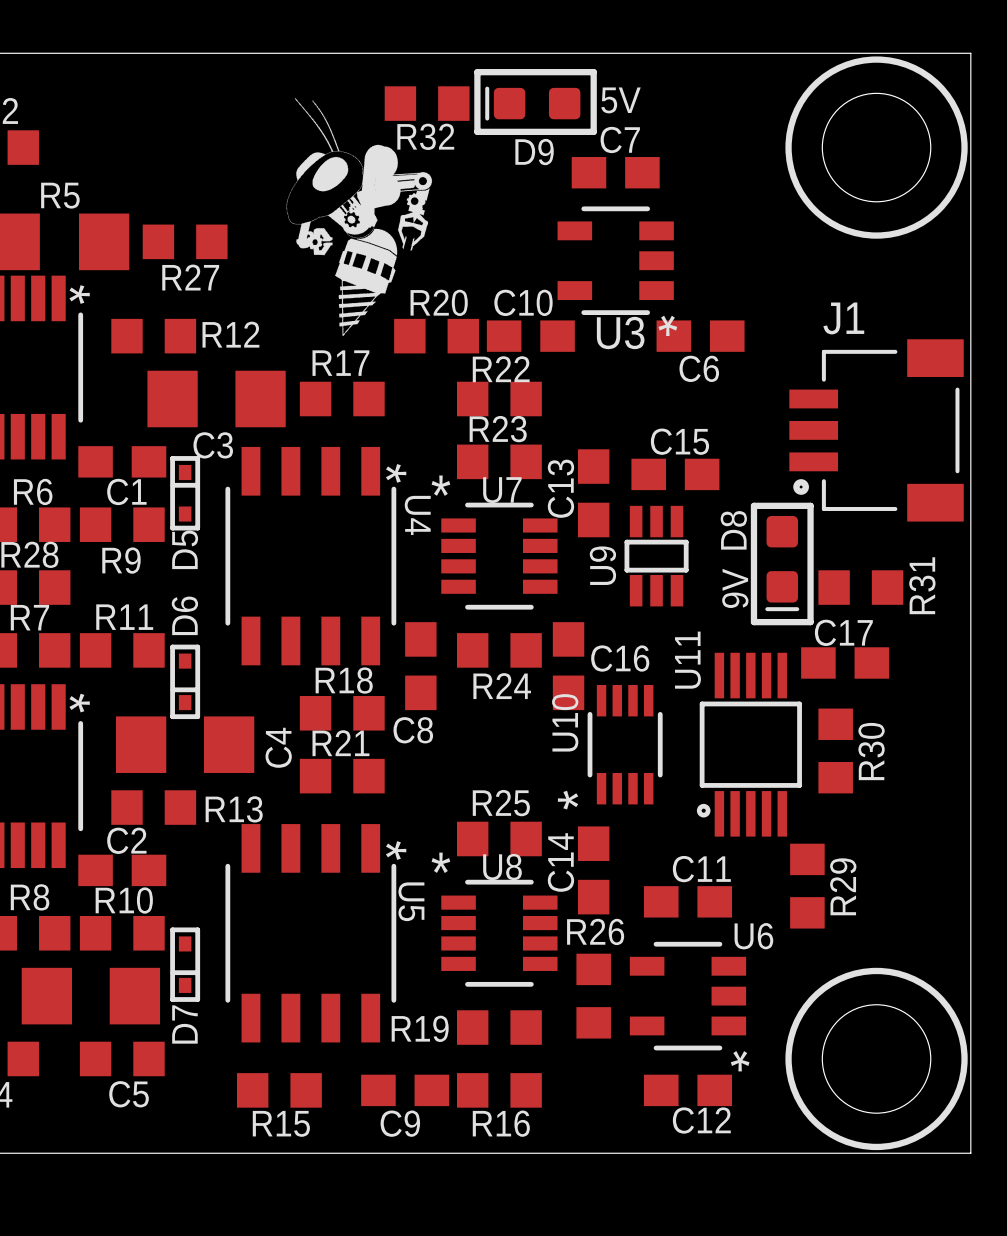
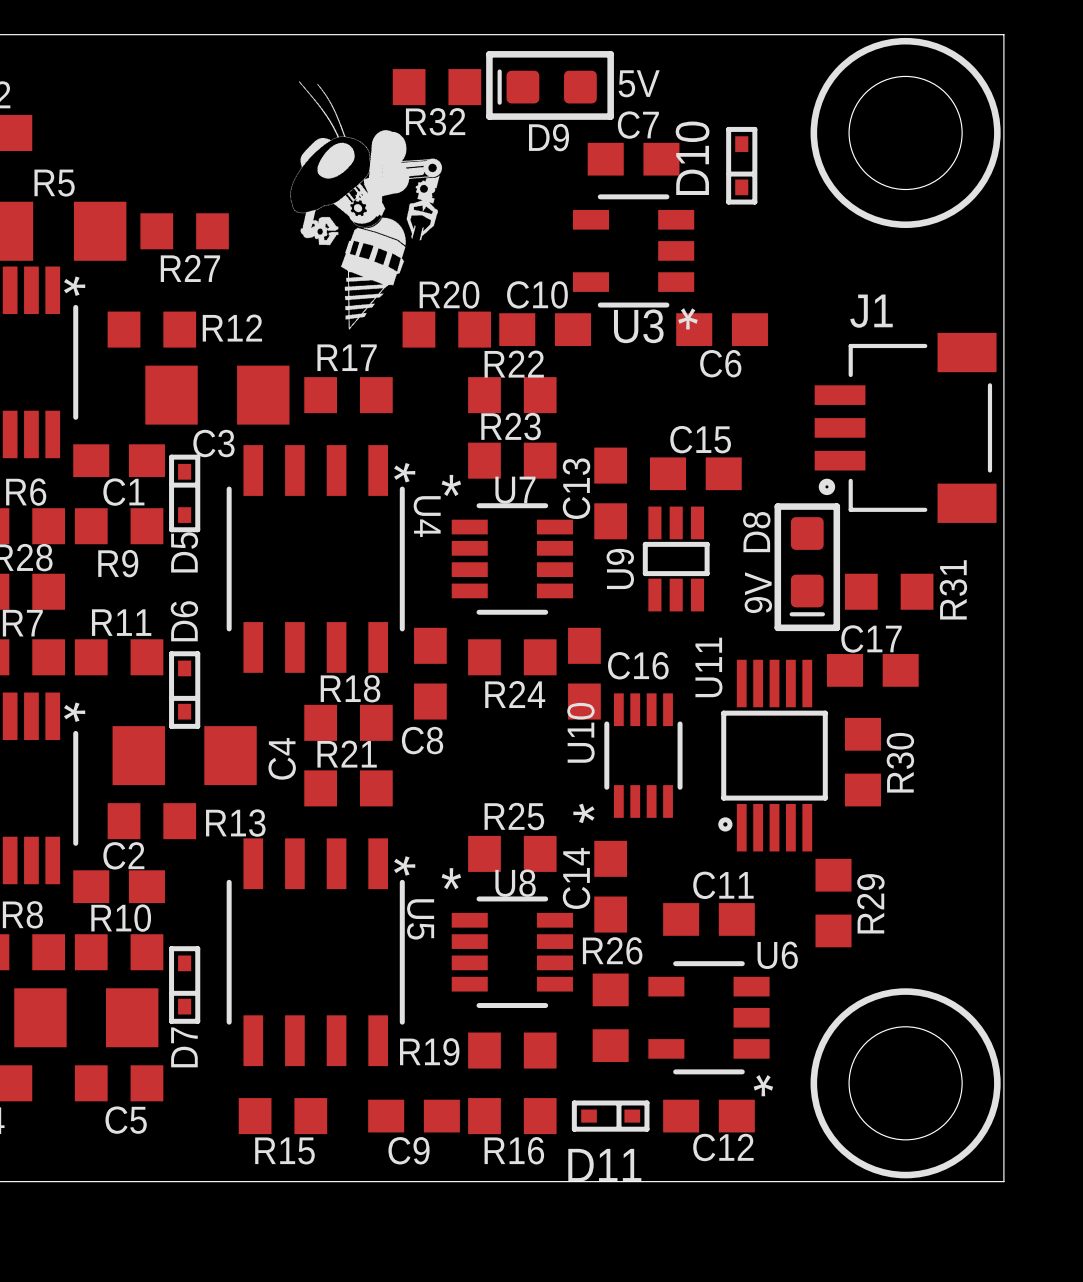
D10: none -> (741, 165)
D11: none -> (610, 1116)

